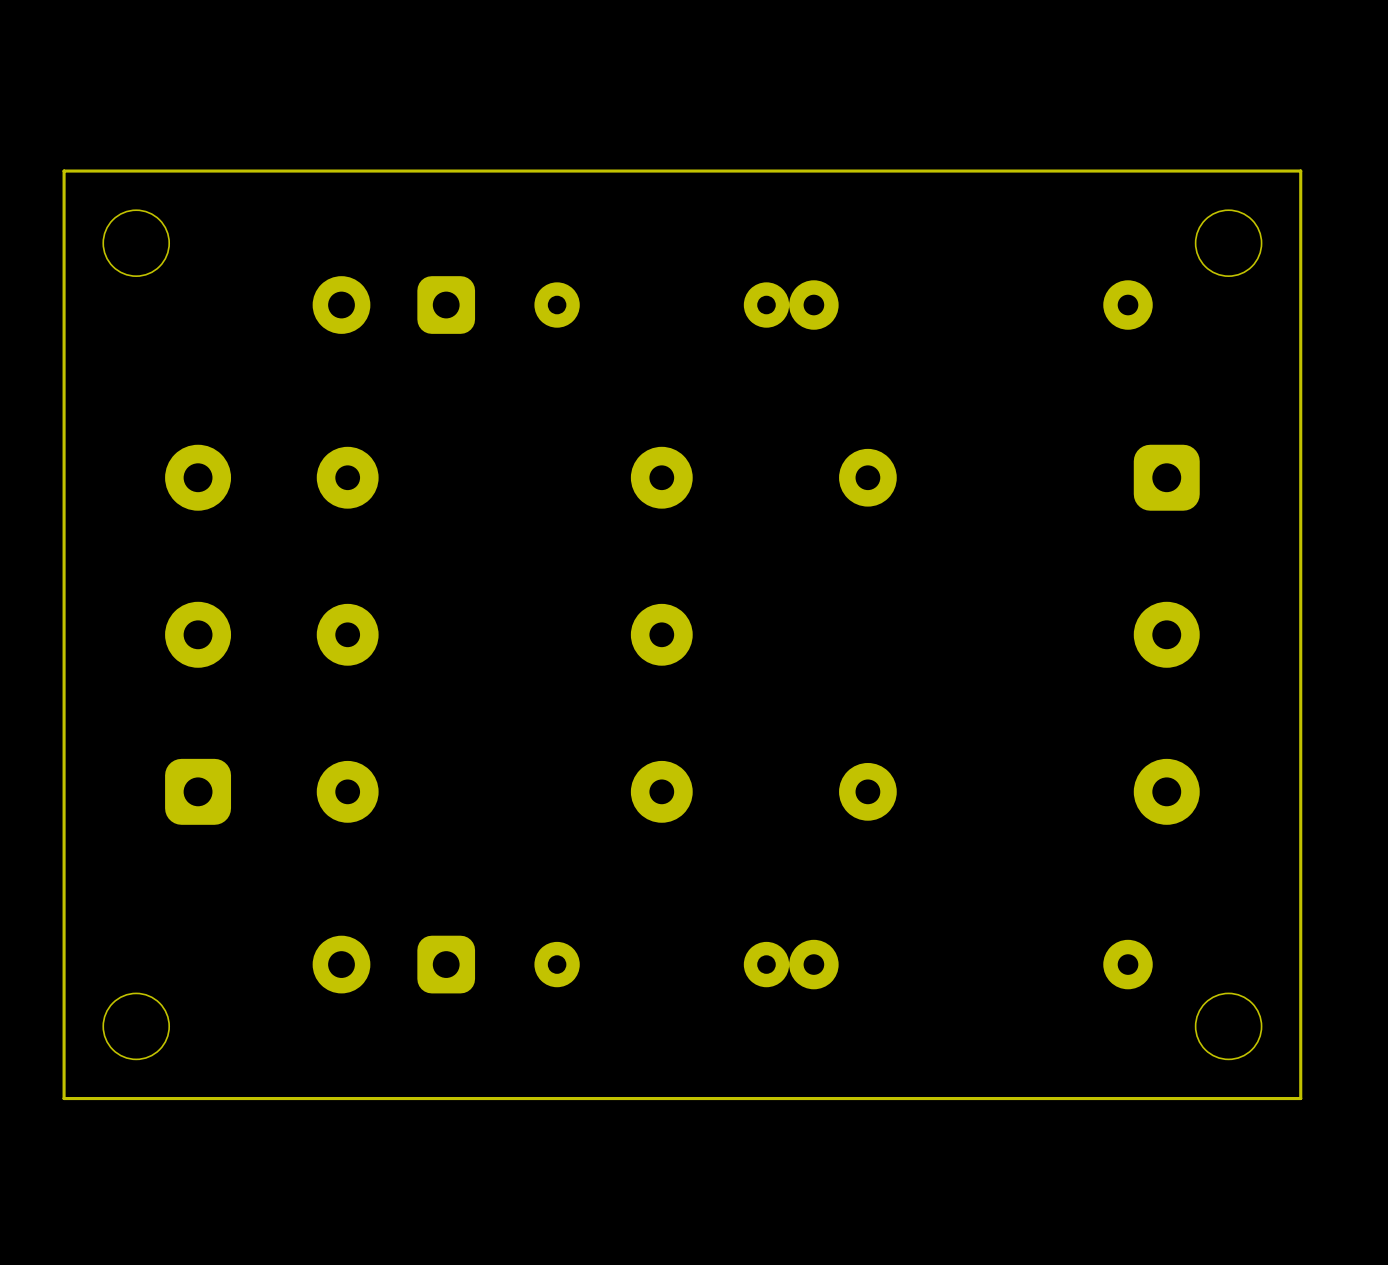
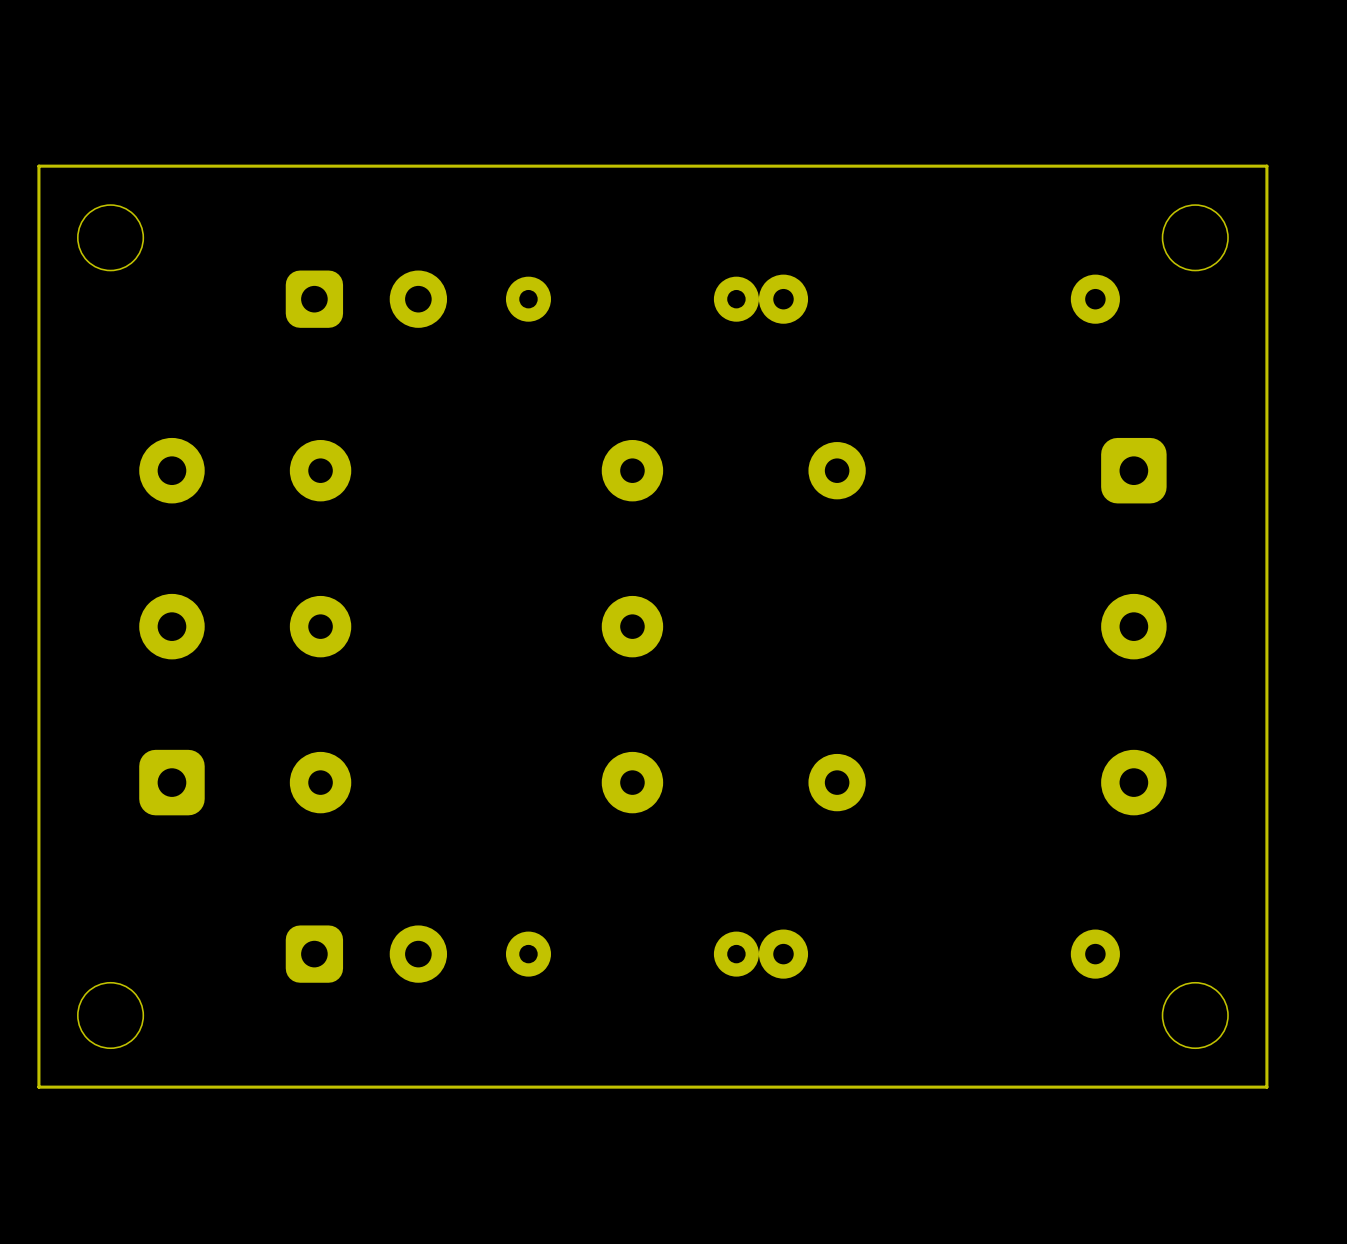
part rotation: 0° (393, 305) -> 180° (366, 299)
part rotation: 0° (393, 964) -> 180° (366, 954)

